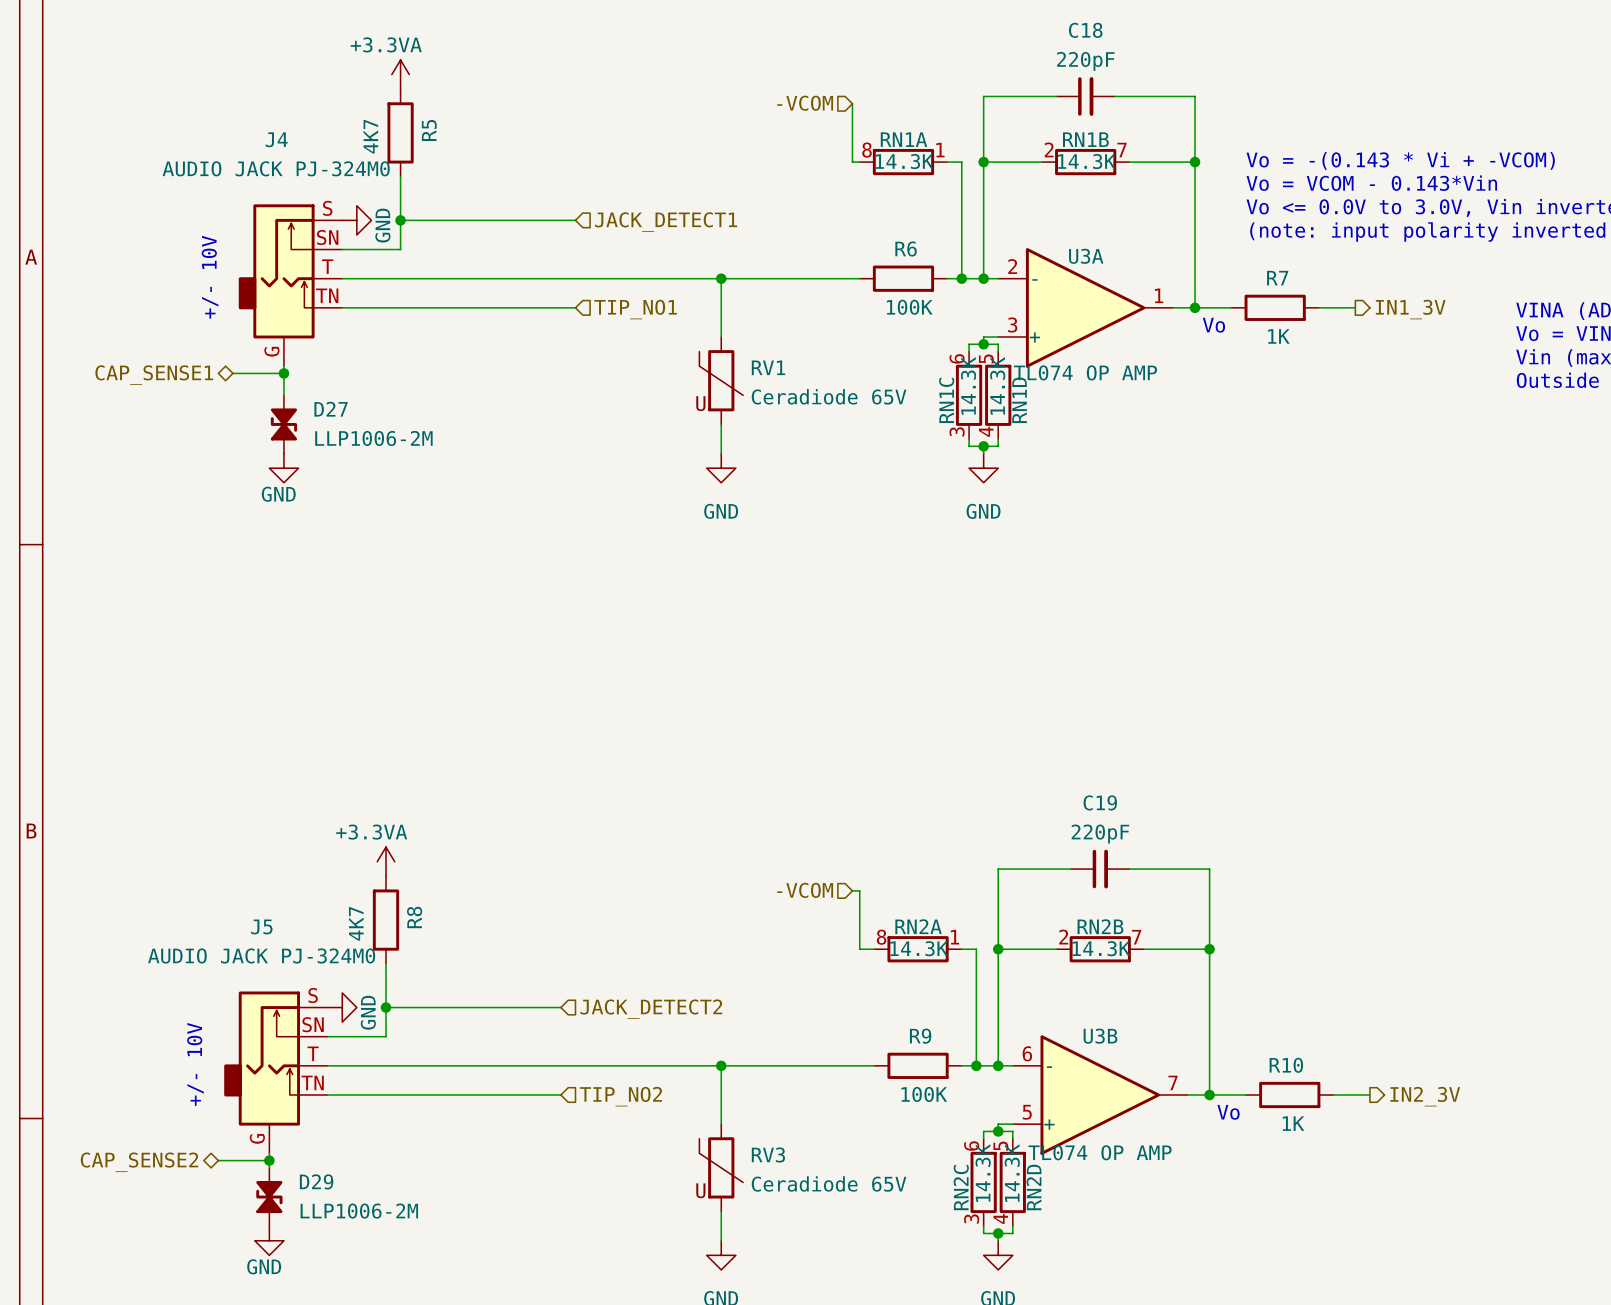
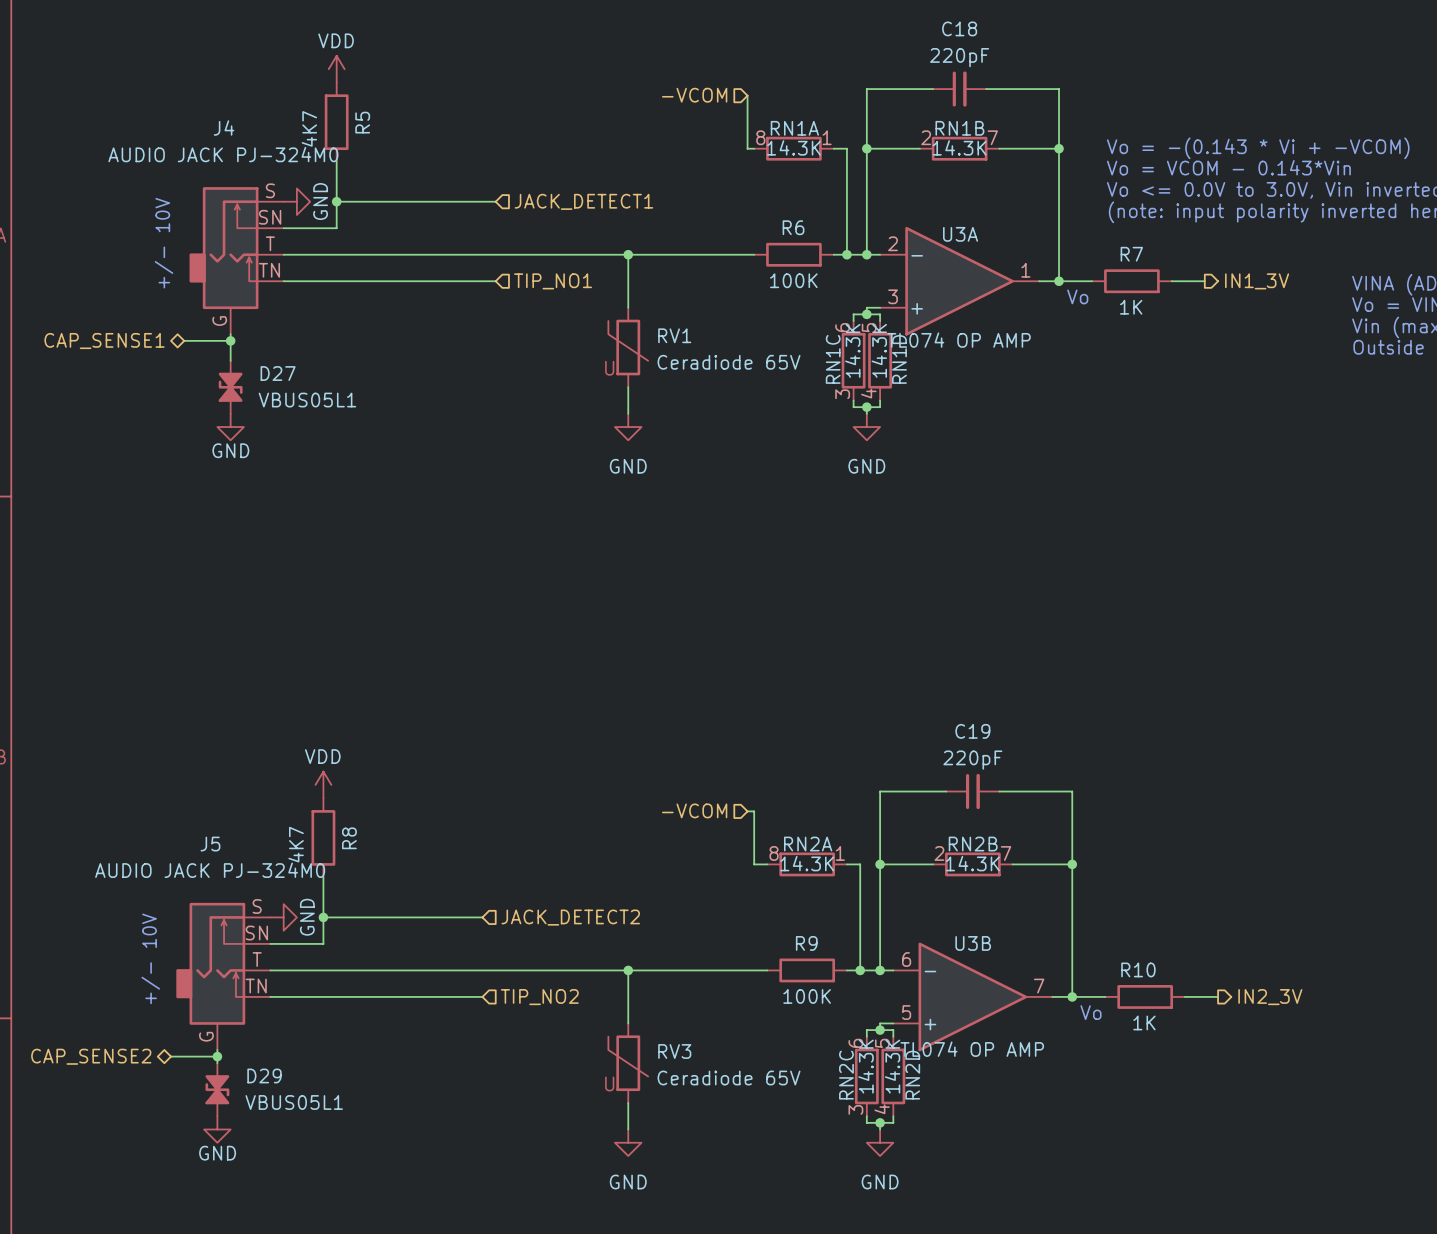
power symbol: +3.3VA (400, 74) -> VDD (336, 69)
D27 value: LLP1006-2M (373, 438) -> VBUS05L1 (307, 400)
power symbol: +3.3VA (385, 861) -> VDD (323, 784)
D29 value: LLP1006-2M (359, 1211) -> VBUS05L1 (294, 1102)

